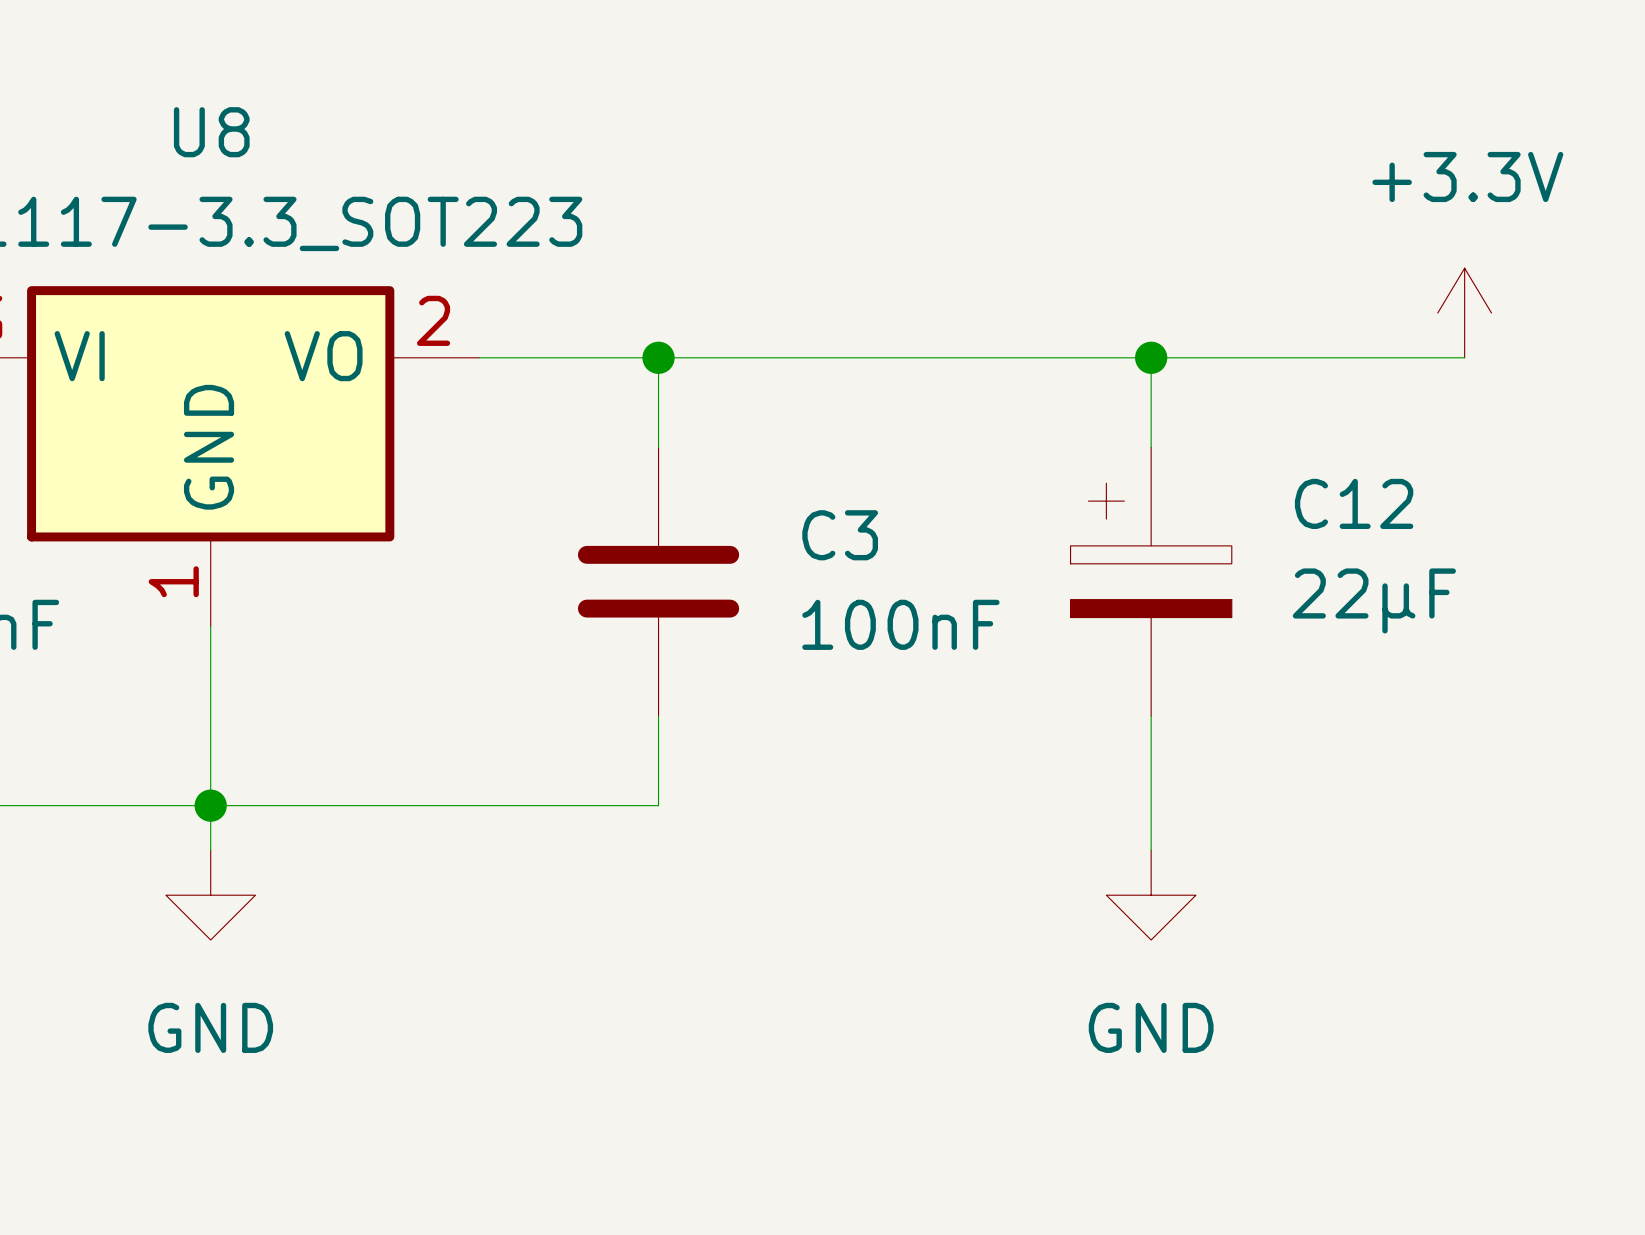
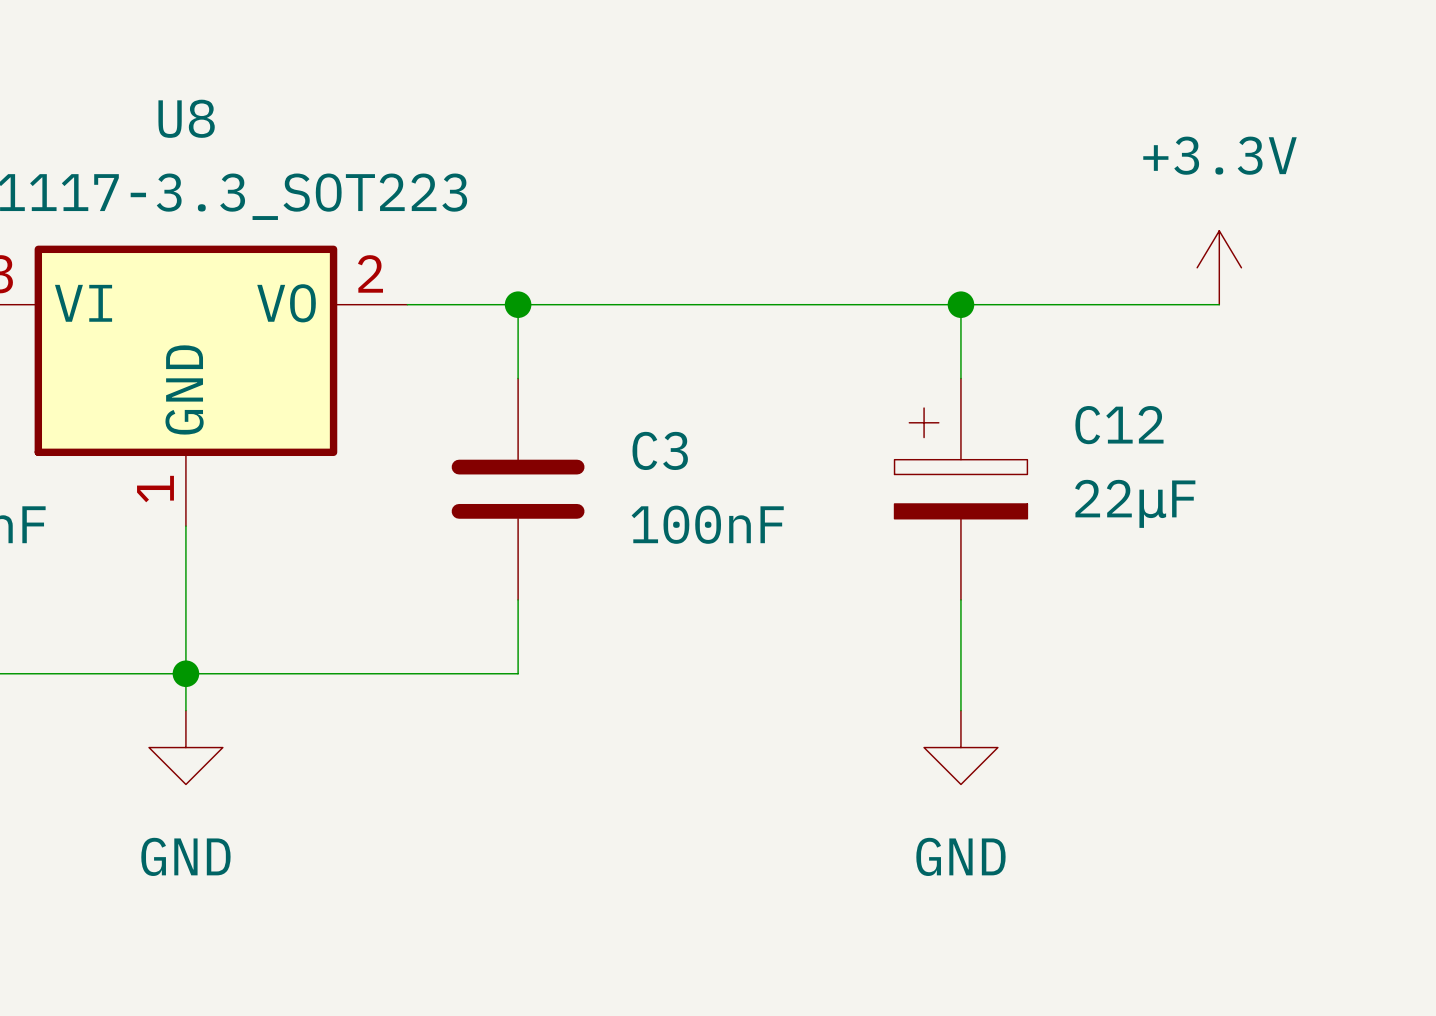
wire: (658, 357) (658, 447) -> (518, 304) (518, 378)
junction position: (658, 357) -> (518, 304)
C3 position: (658, 581) -> (518, 489)
wire: (658, 716) (658, 805) (613, 805) -> (518, 599) (518, 673)

